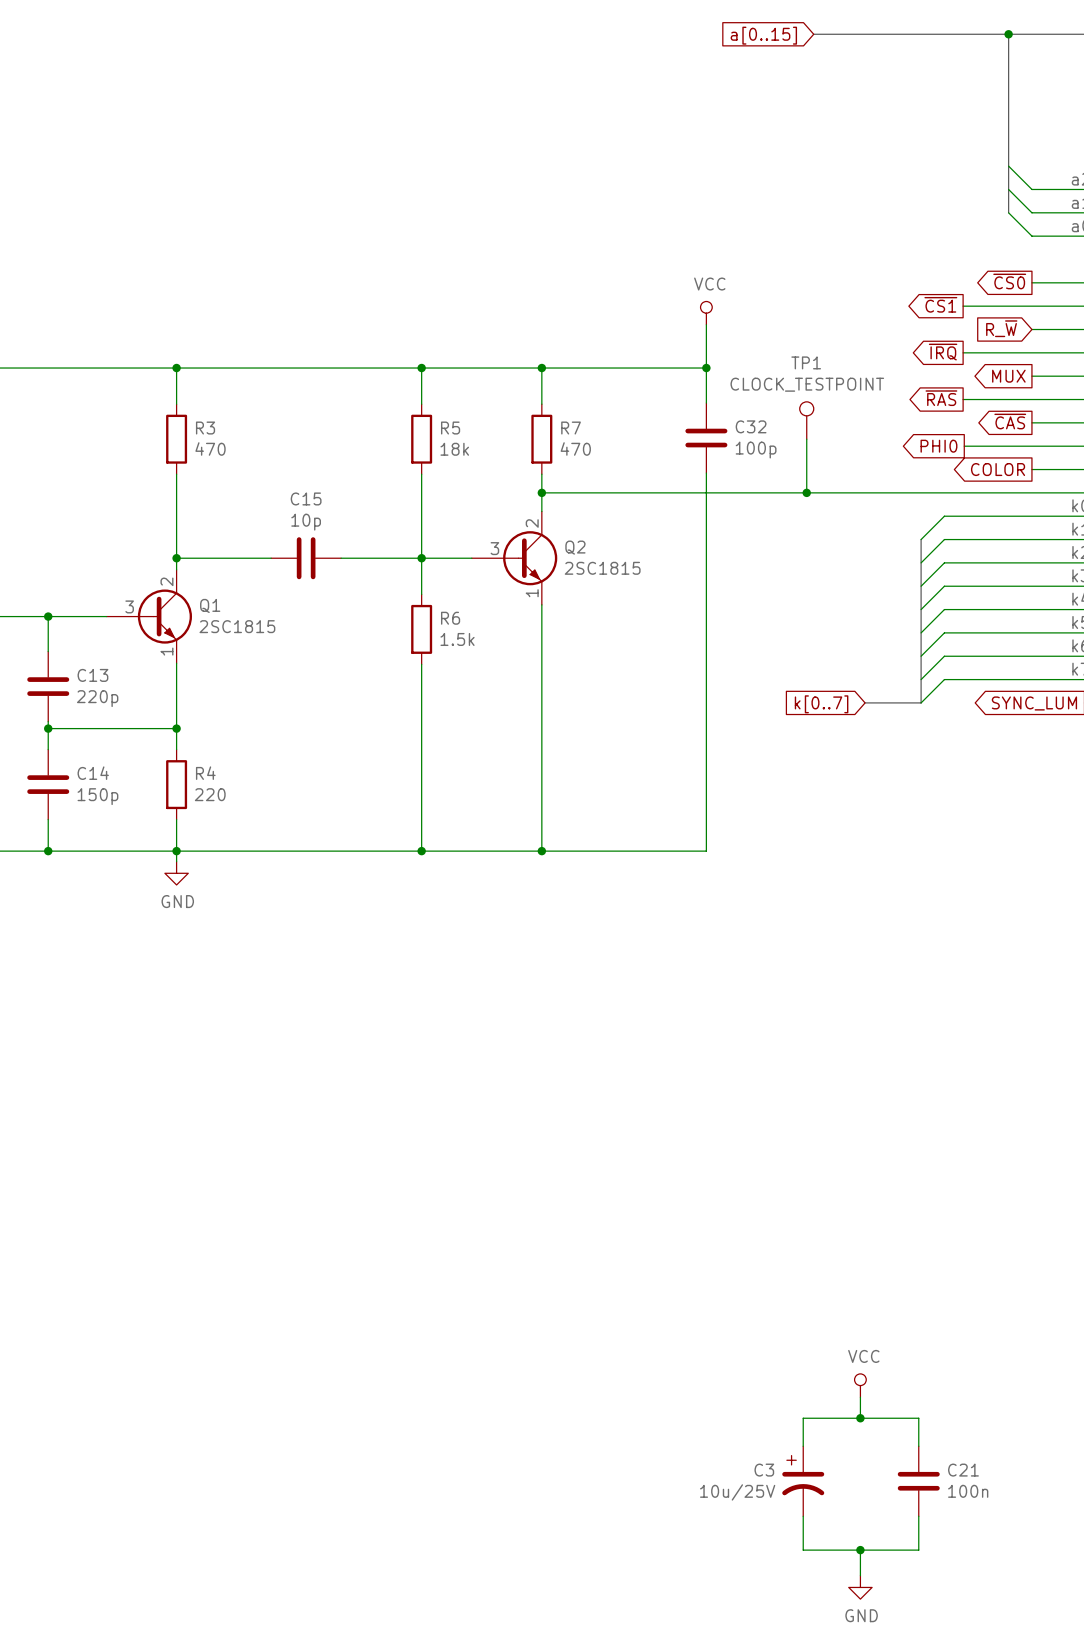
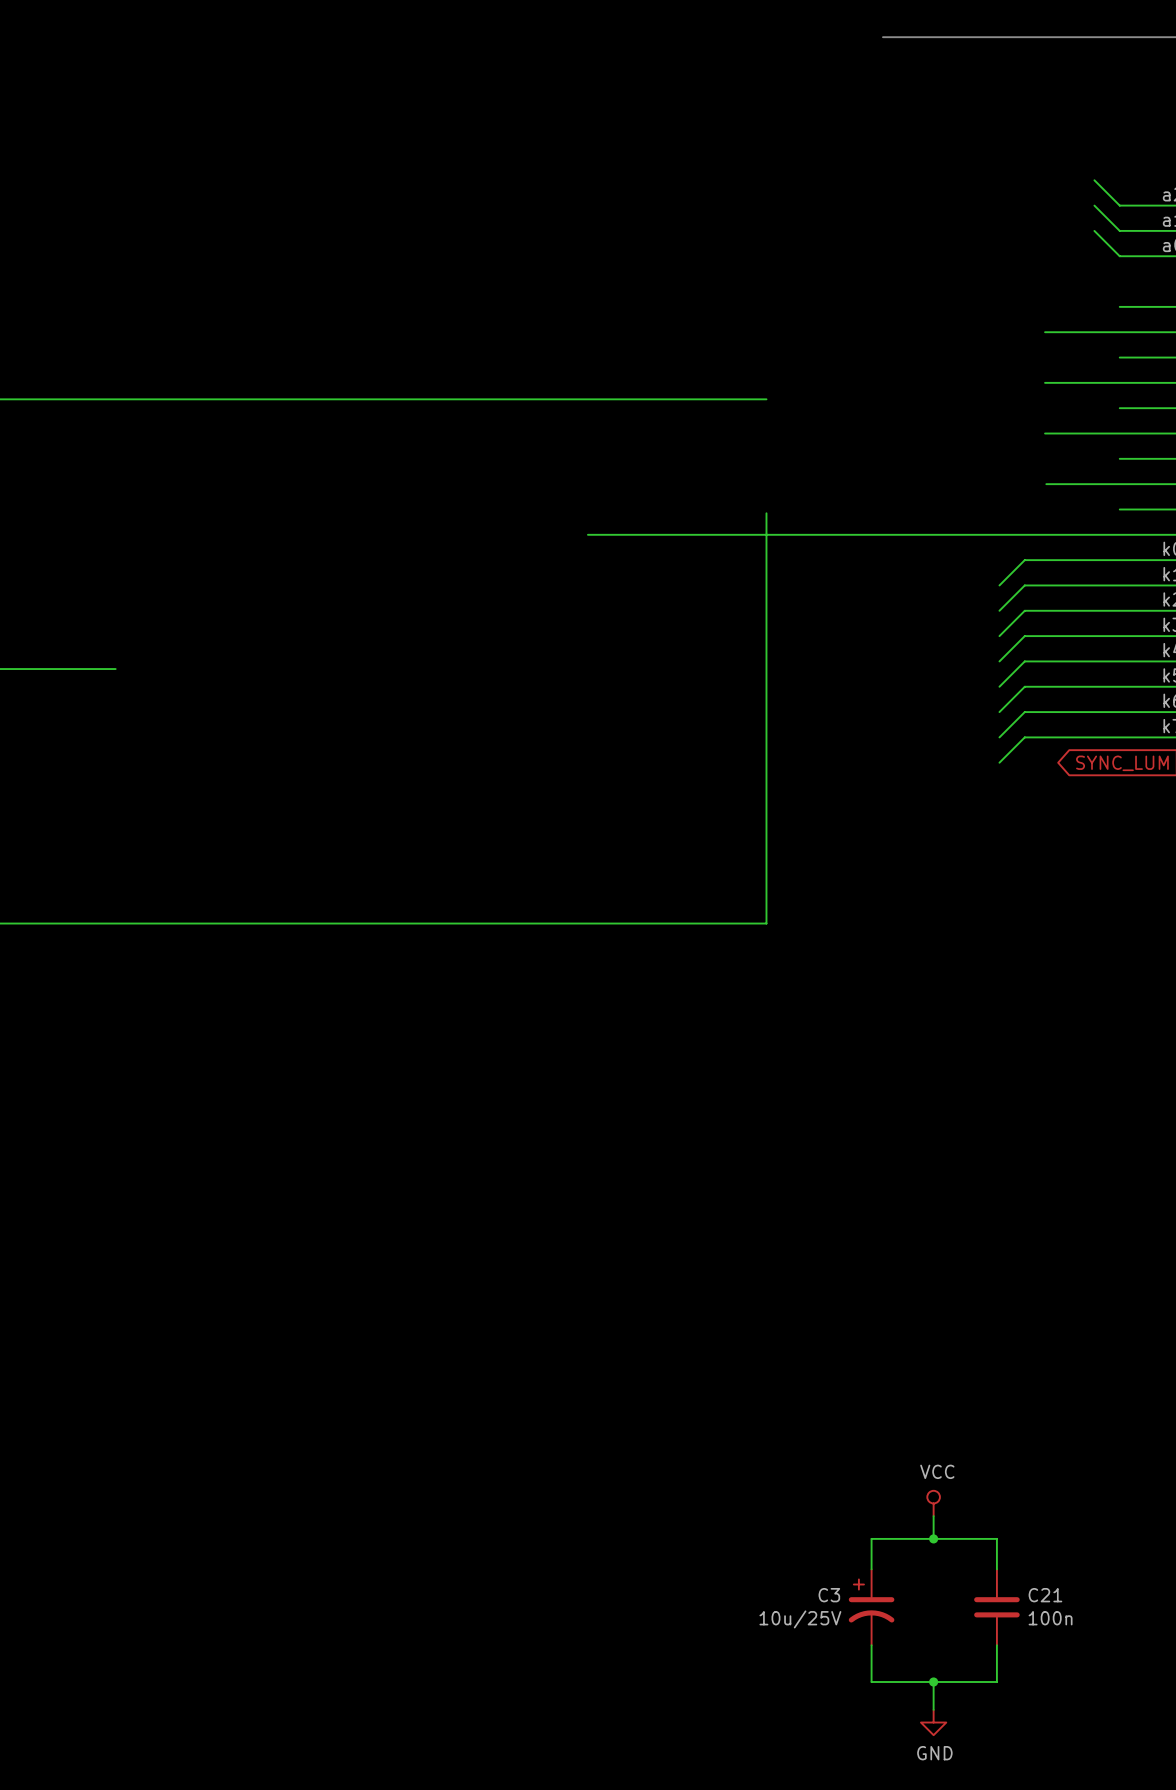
bus: (1008, 34) (1008, 212) -> none
junction: (1008, 34) -> none
global label: a[0..15] (763, 35) -> none
global label: ~{CS0} (1009, 281) -> none
global label: ~{CS1} (940, 304) -> none
power symbol: VCC (706, 313) -> none
wire: (706, 324) (706, 403) -> none
global label: R_~{W} (1001, 328) -> none
global label: ~{IRQ} (943, 352) -> none
wire: (176, 368) (176, 404) -> none
junction: (176, 368) -> none
wire: (421, 368) (421, 404) -> none
junction: (421, 368) -> none
wire: (541, 368) (541, 404) -> none
junction: (541, 368) -> none
junction: (706, 368) -> none
global label: MUX (1008, 376) -> none
global label: ~{RAS} (941, 398) -> none
TP1: CLOCK_TESTPOINT (806, 420) -> none
global label: ~{CAS} (1010, 421) -> none
C32: 100p (706, 438) -> none
R3: 470 (176, 439) -> none
R5: 18k (421, 439) -> none
R7: 470 (541, 439) -> none
wire: (806, 439) (806, 492) -> none
global label: PHI0 (938, 446) -> none
global label: COLOR (998, 469) -> none
wire: (176, 474) (176, 569) -> none
wire: (421, 474) (421, 594) -> none
wire: (541, 474) (541, 511) -> none
junction: (541, 492) -> none
junction: (806, 492) -> none
bus: (921, 539) (921, 702) (865, 702) -> none
wire: (176, 558) (271, 558) -> none
junction: (176, 558) -> none
C15: 10p (306, 558) -> none
wire: (341, 558) (471, 558) -> none
junction: (421, 558) -> none
Q2: 2SC1815 (514, 558) -> none
wire: (541, 604) (541, 851) -> none
wire: (48, 616) (48, 651) -> none
junction: (48, 616) -> none
Q1: 2SC1815 (149, 616) -> none
R6: 1.5k (421, 629) -> none
wire: (176, 663) (176, 749) -> none
wire: (421, 664) (421, 851) -> none
C13: 220p (48, 686) -> none
global label: k[0..7] (821, 704) -> none
wire: (48, 721) (48, 749) -> none
wire: (48, 728) (176, 728) -> none
junction: (48, 728) -> none
junction: (176, 728) -> none
C14: 150p (48, 784) -> none
R4: 220 (176, 784) -> none
wire: (48, 819) (48, 851) -> none
wire: (176, 819) (176, 861) -> none
junction: (48, 851) -> none
junction: (176, 851) -> none
junction: (421, 851) -> none
junction: (541, 851) -> none
power symbol: GND (176, 873) -> none

